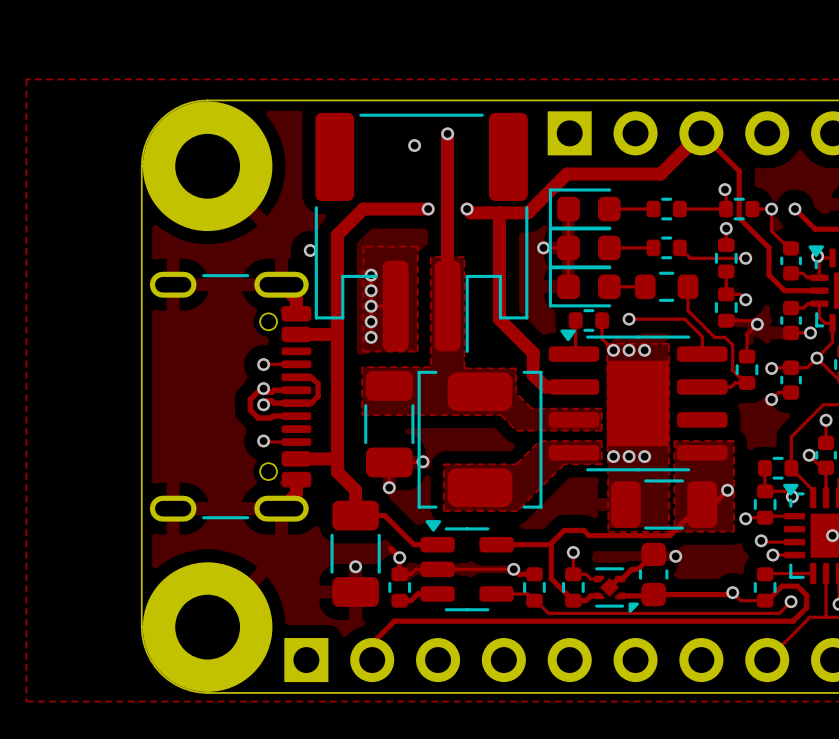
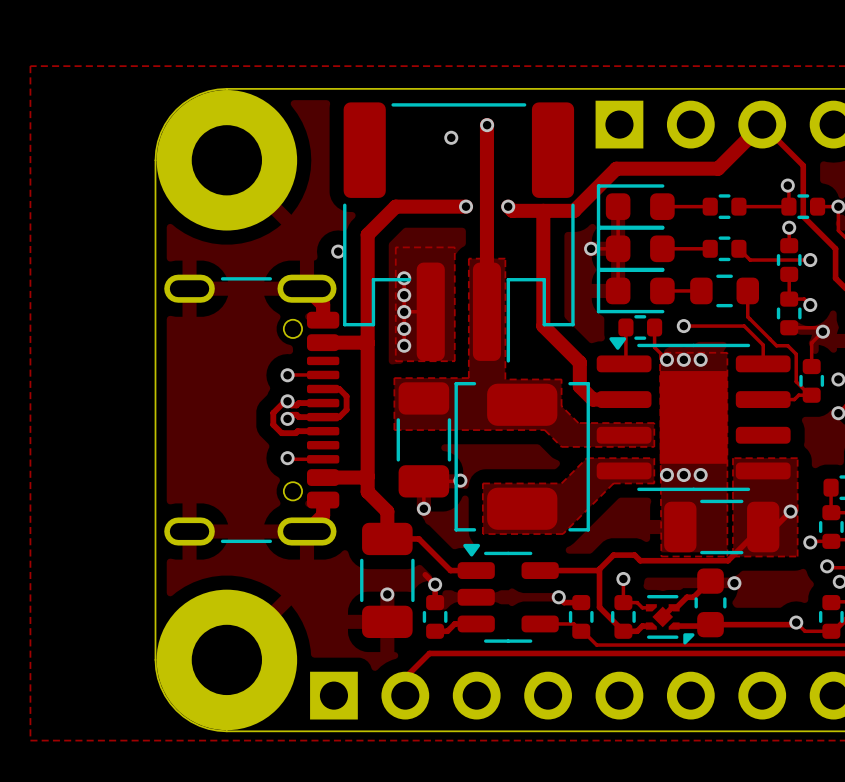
track: (513, 569) (415, 569) (410, 574) (399, 574) -> none

